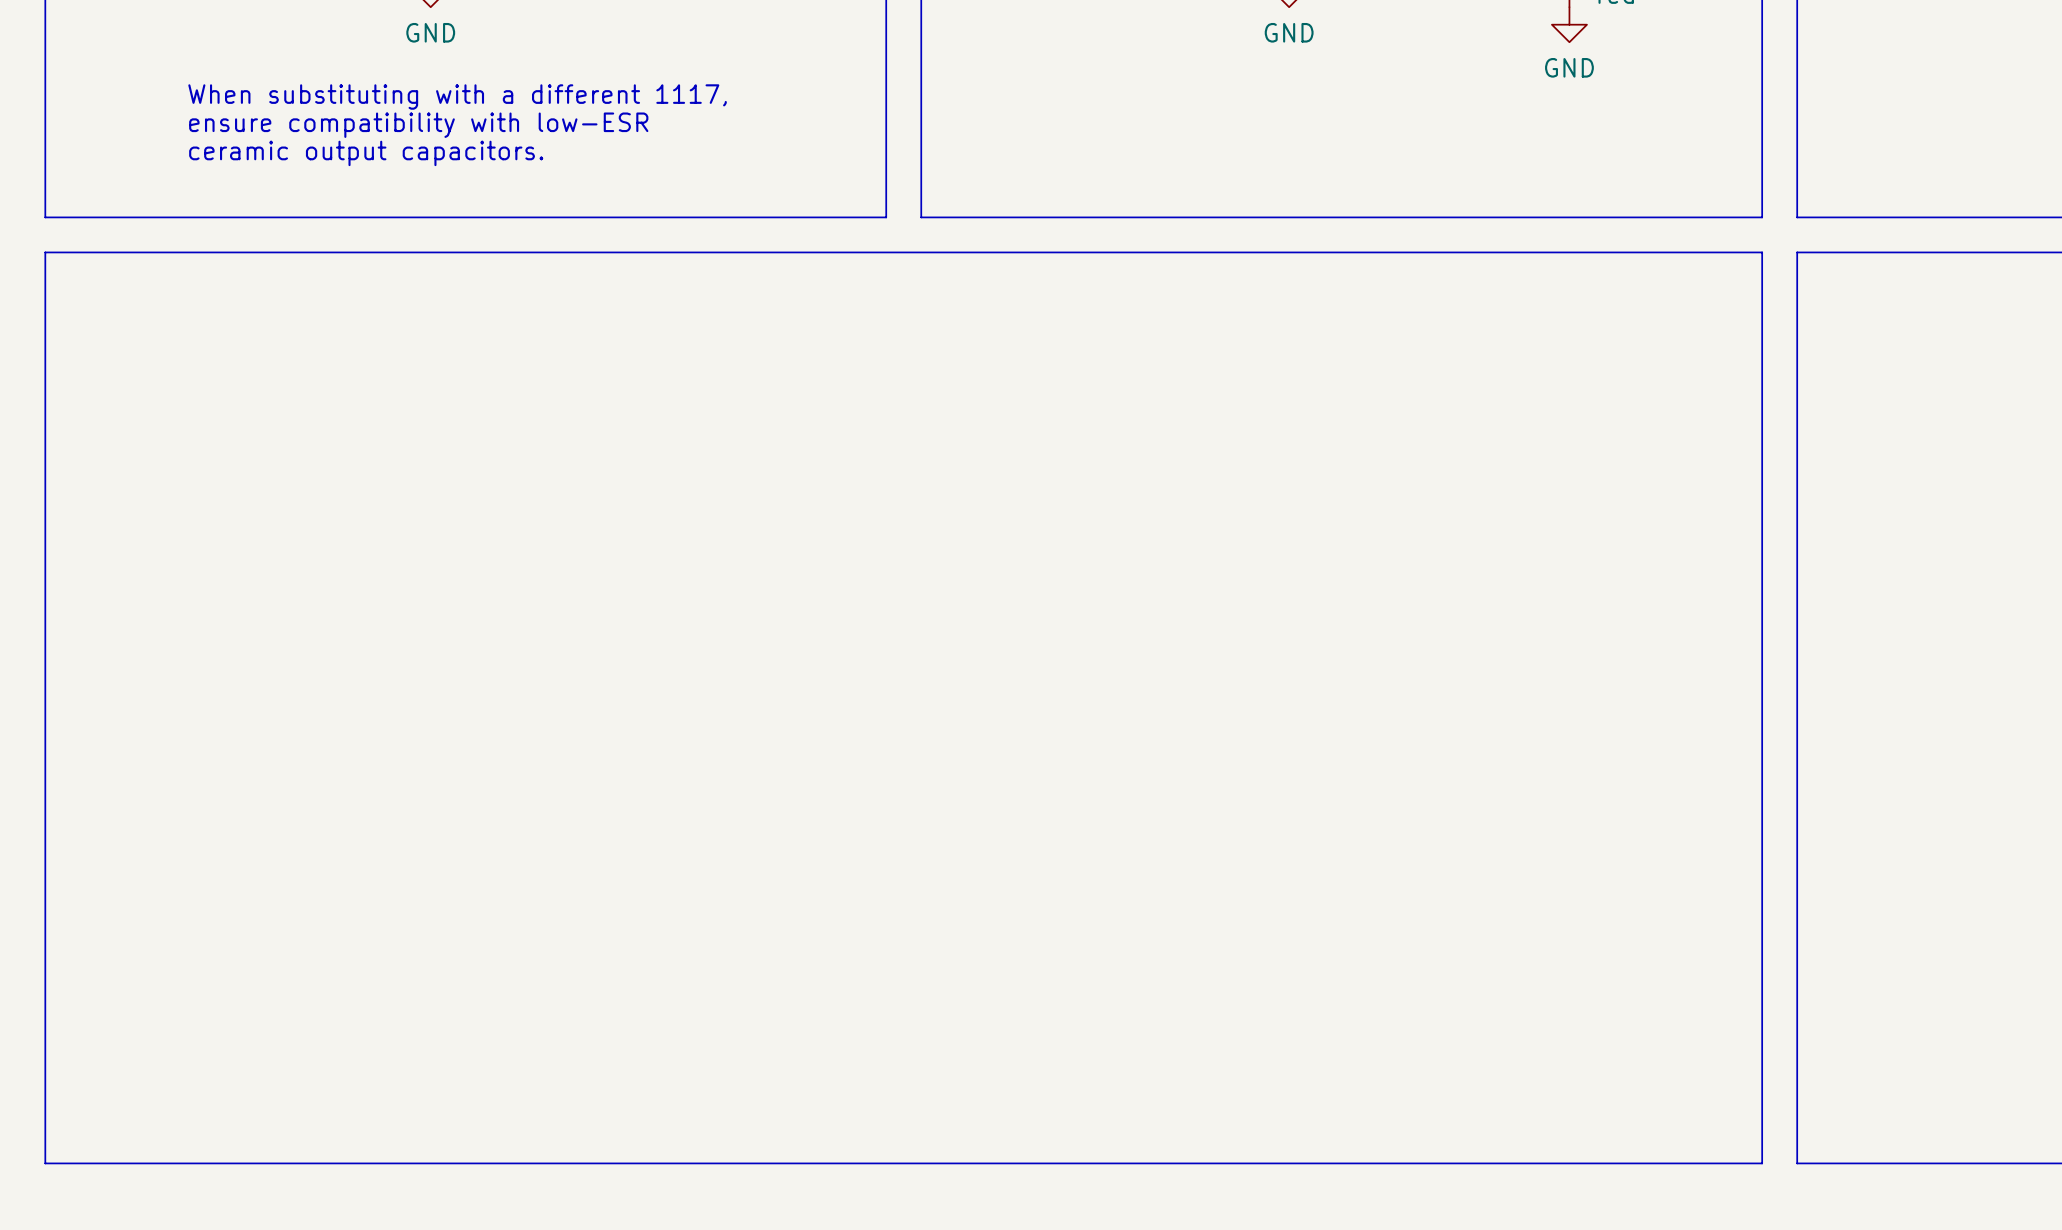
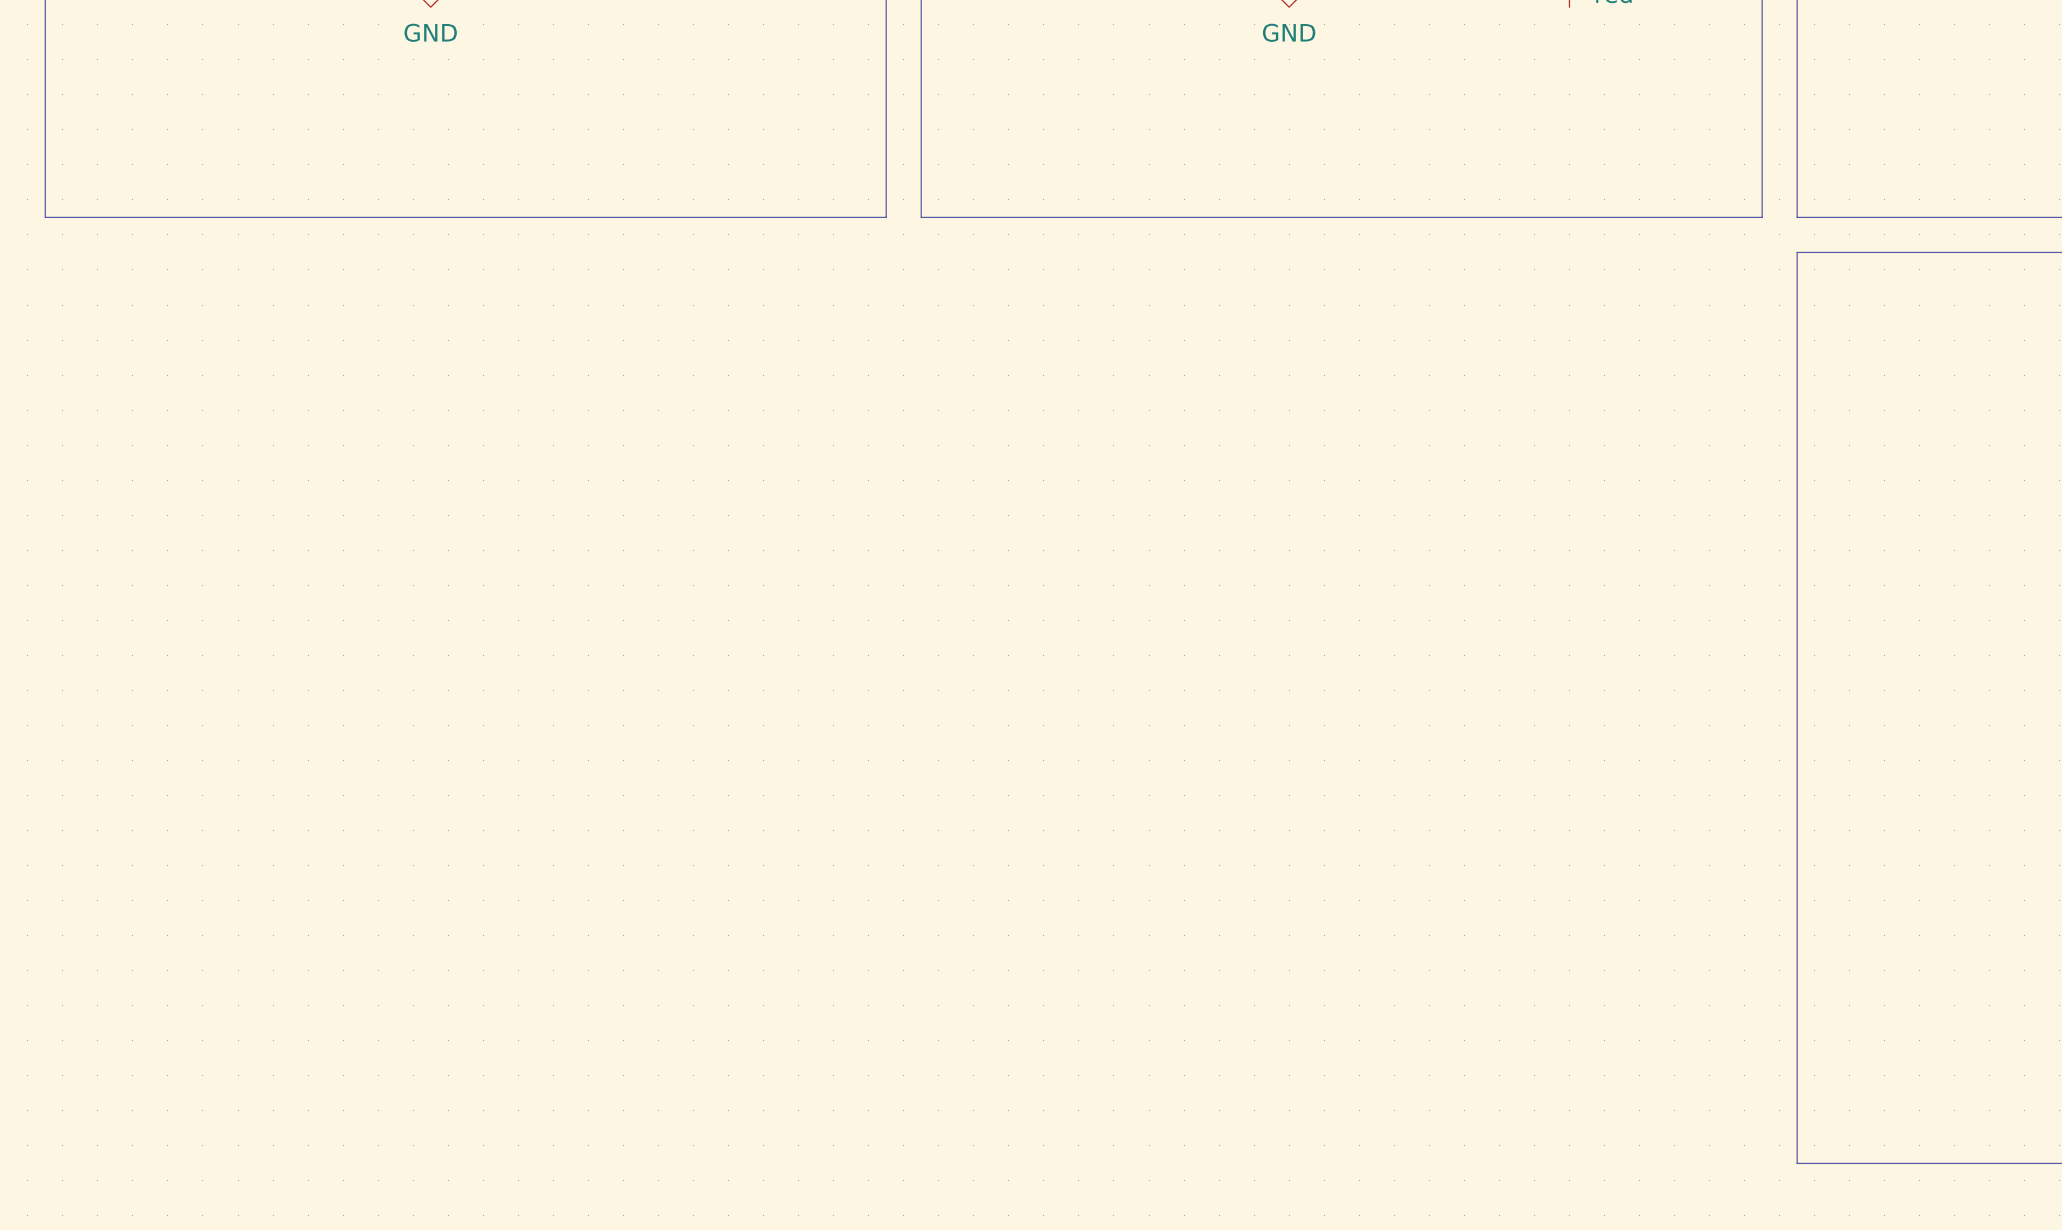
power symbol: GND (1569, 24) -> none
text: When substituting with a different 1117, (457, 97) -> none
text: ensure compatibility with low-ESR (418, 125) -> none
text: ceramic output capacitors. (366, 153) -> none
line: (45, 252) (45, 1163) (1762, 1163) (1762, 252) (45, 252) -> none

